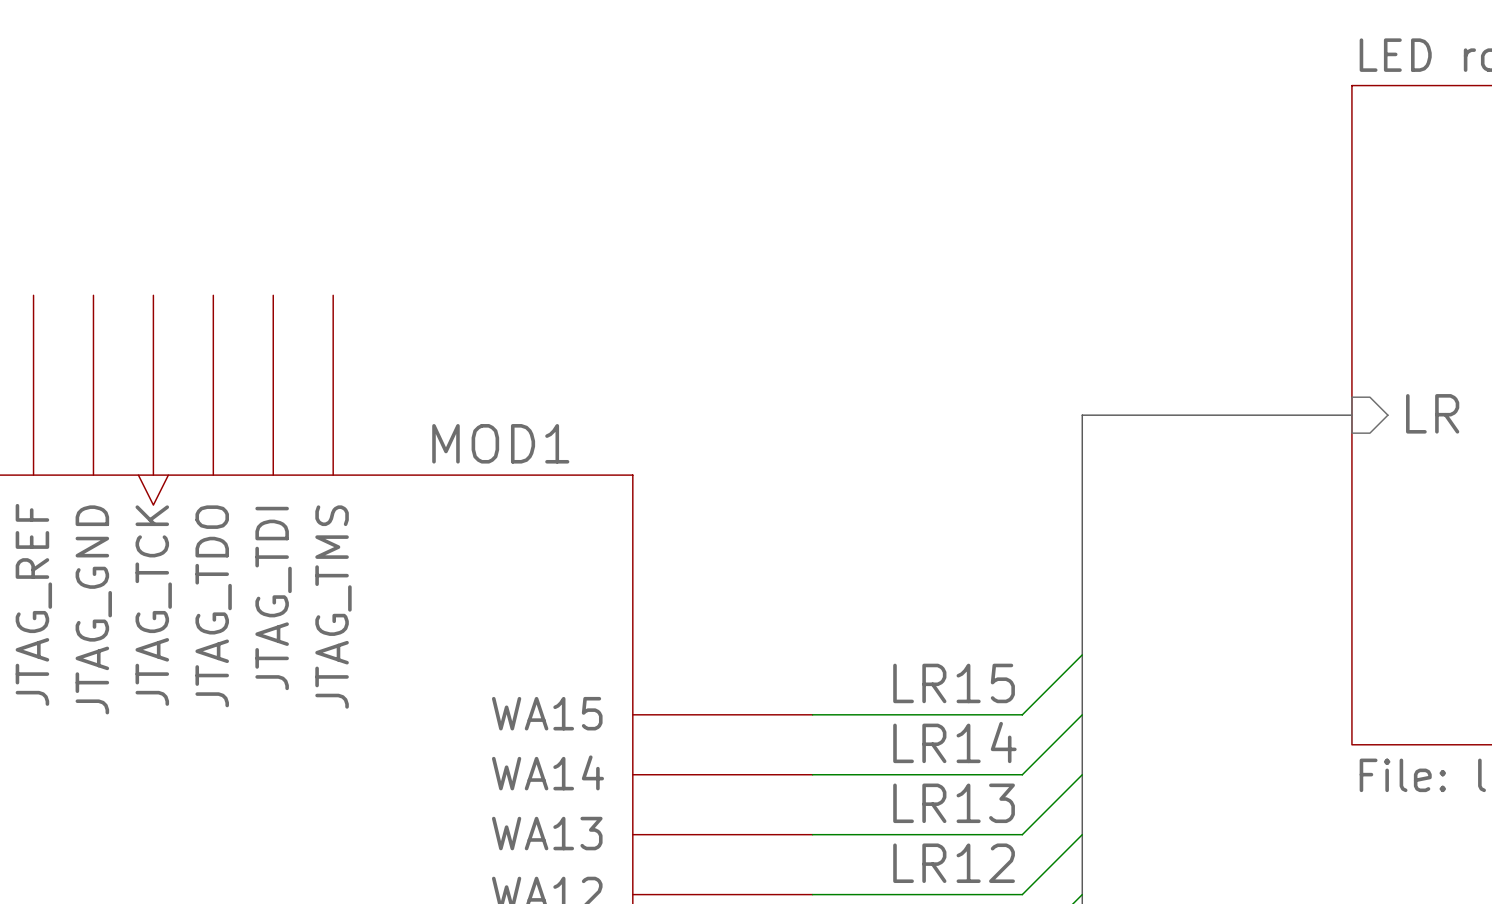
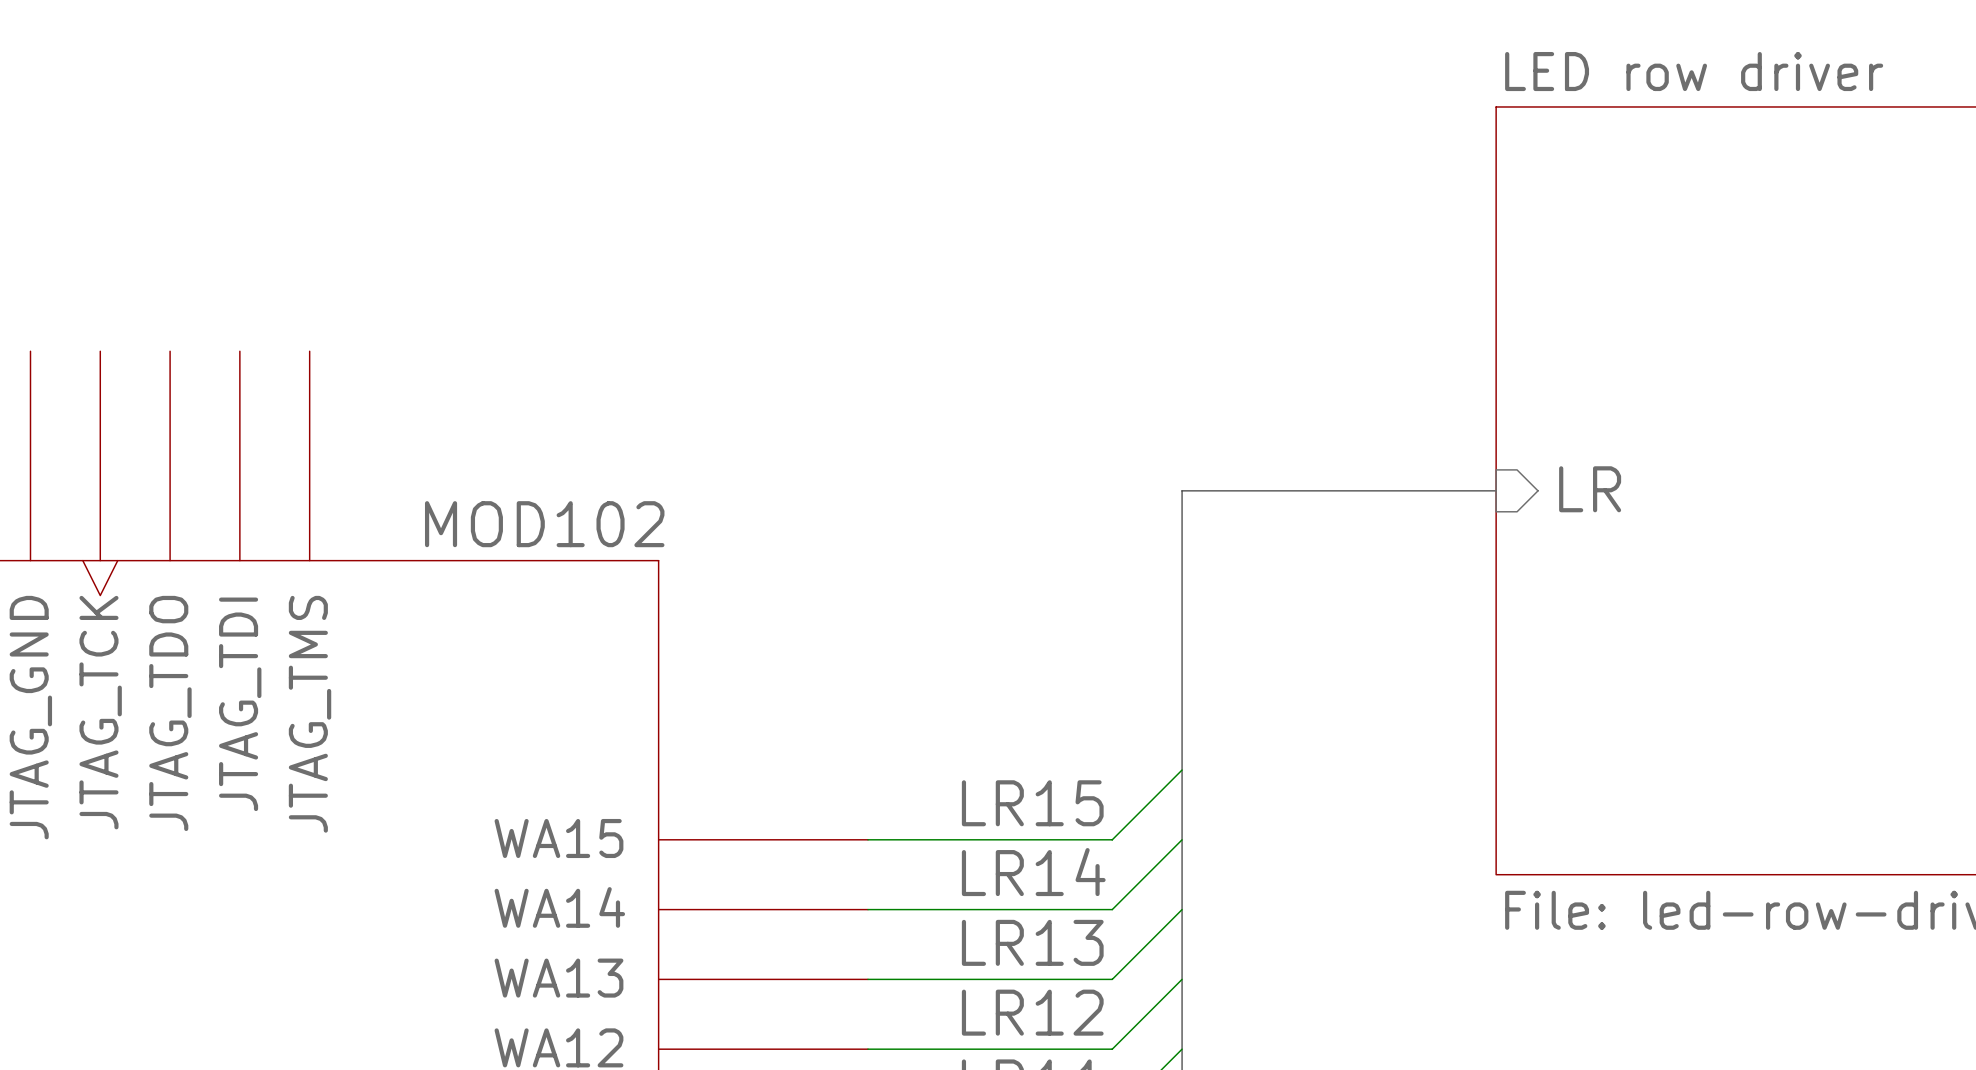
MOD1 name: MOD1 (500, 443) -> MOD102 (544, 524)

